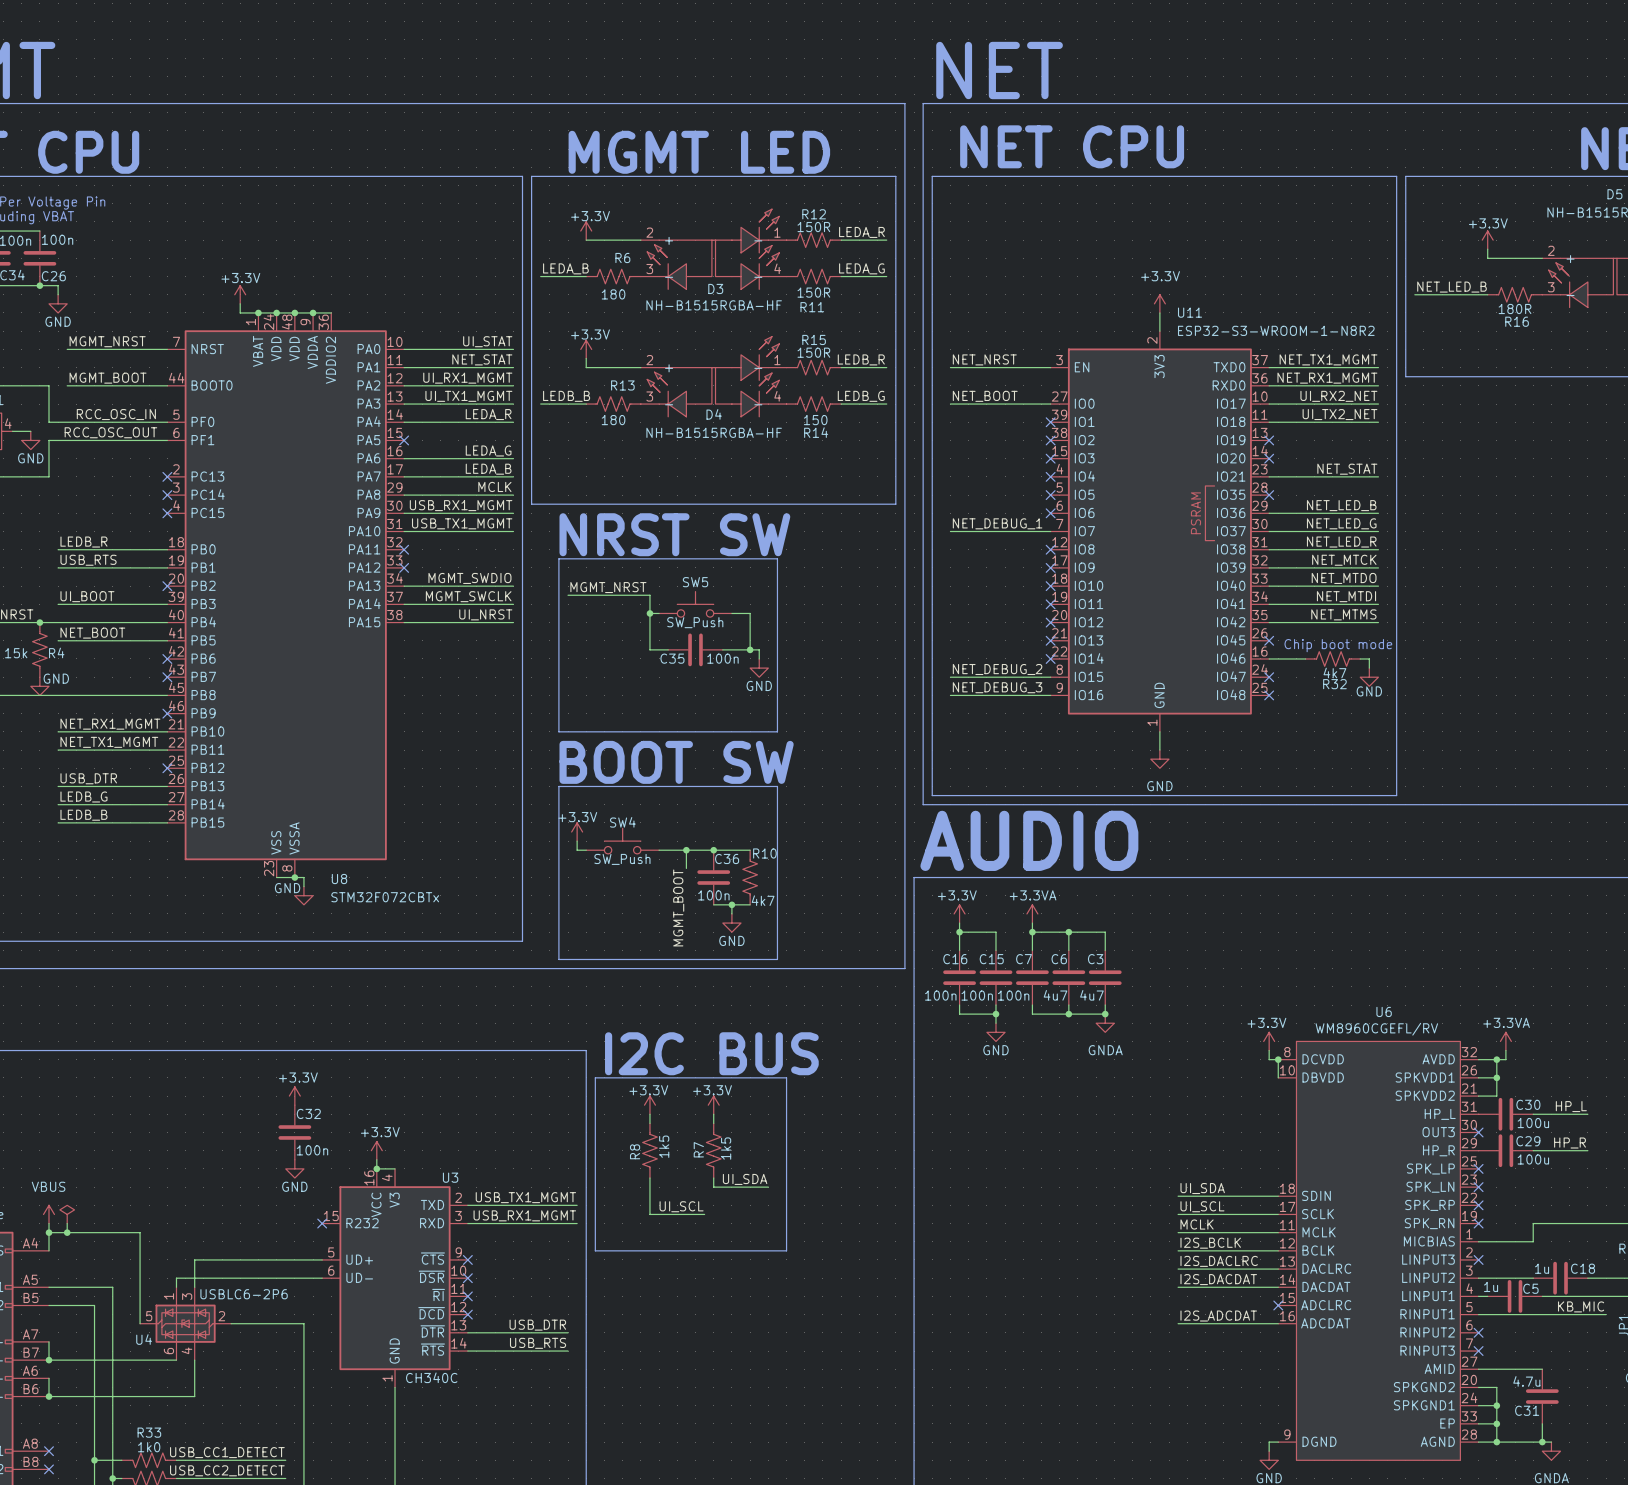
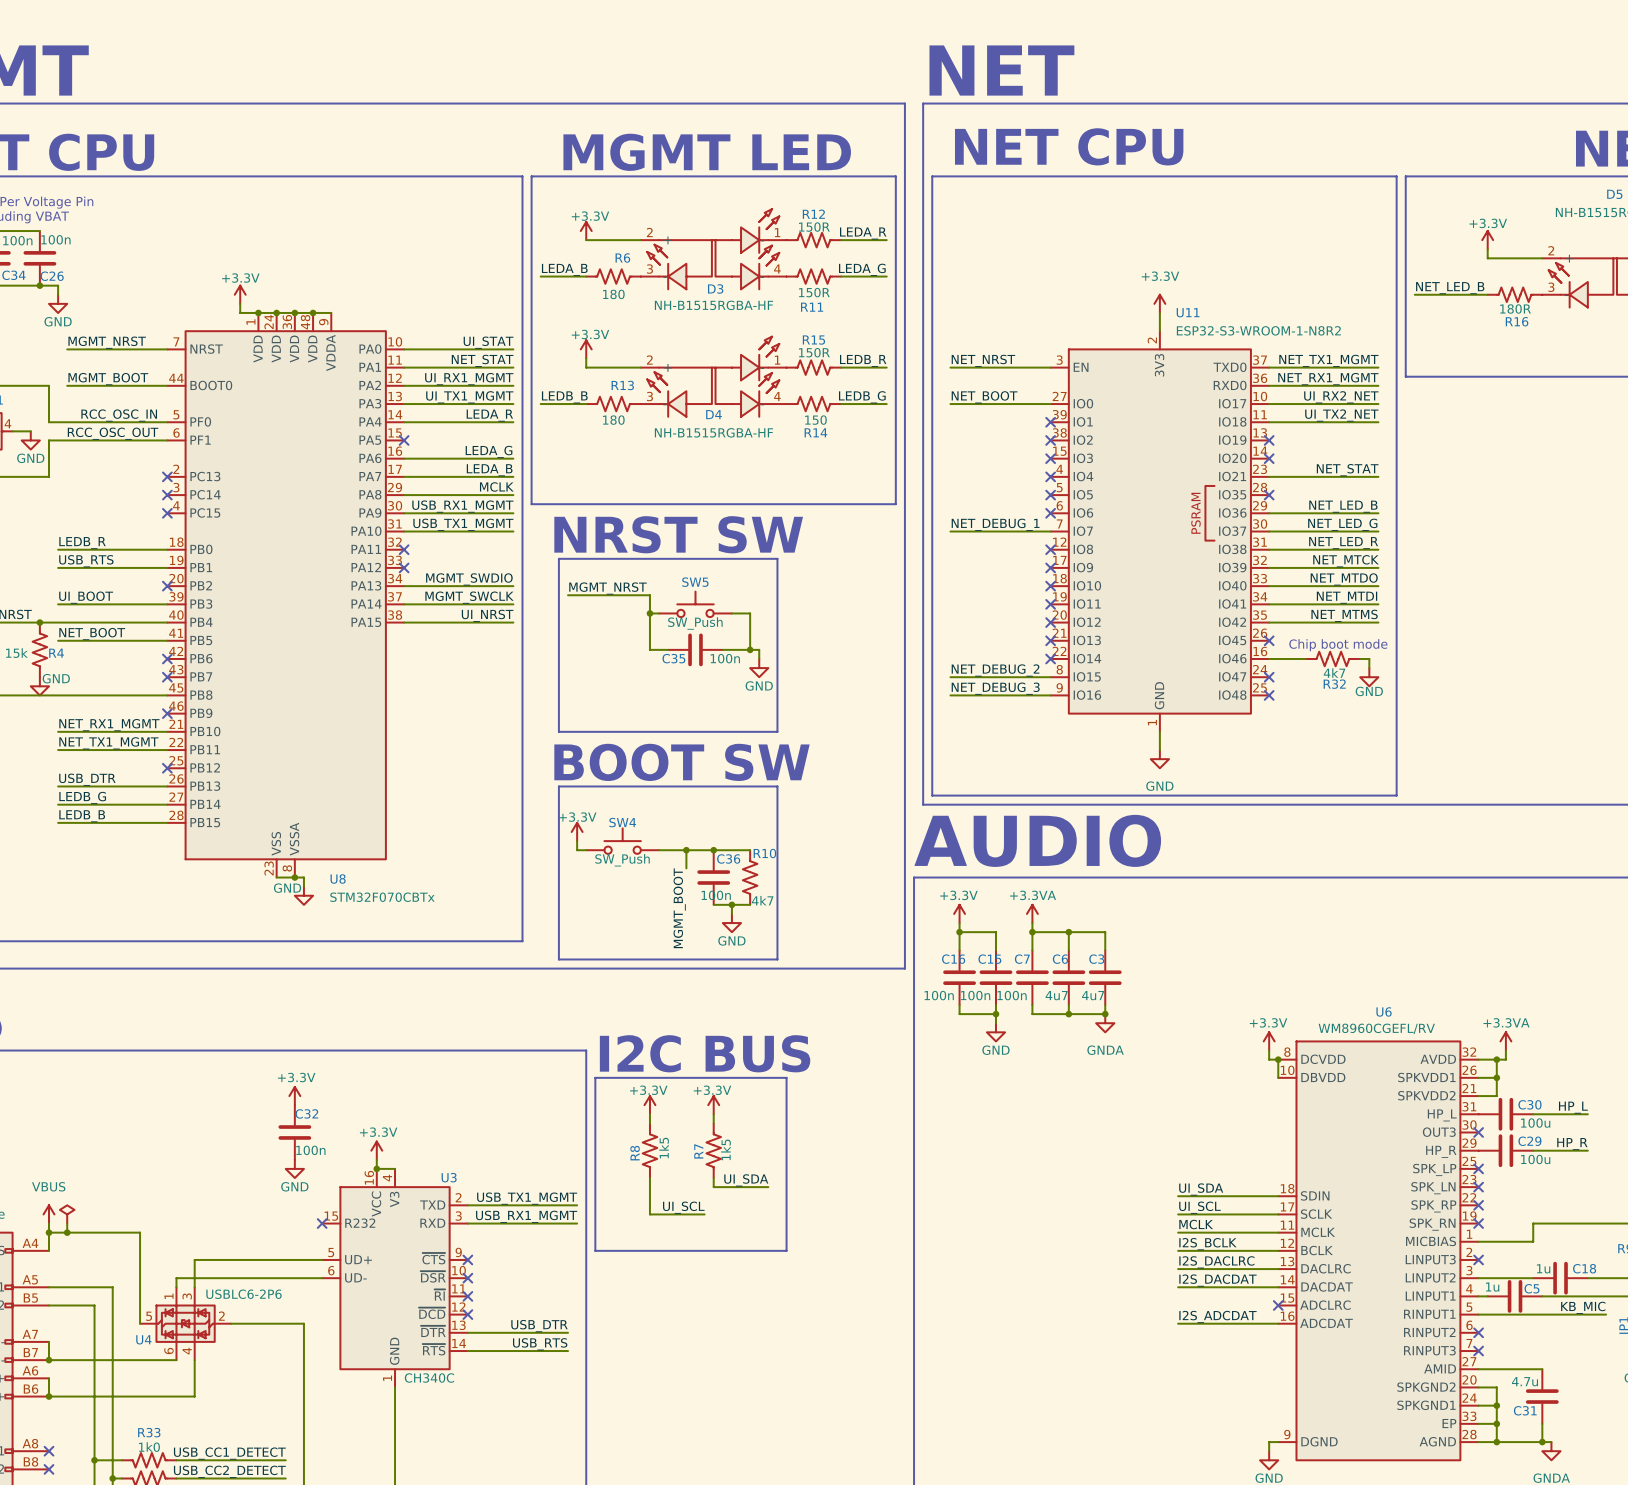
U8 pin number: 48 (287, 322) -> 36 (287, 321)
U8 pin number: 9 (305, 322) -> 48 (305, 322)
U8 pin number: 36 (323, 322) -> 9 (323, 322)
U8 pin name: VBAT (258, 351) -> VDD (258, 349)
U8 pin name: VDDA (312, 352) -> VDD (312, 349)
U8 pin name: VDDIO2 (330, 360) -> VDDA (330, 352)
U8 value: STM32F072CBTx (385, 897) -> STM32F070CBTx (382, 897)

